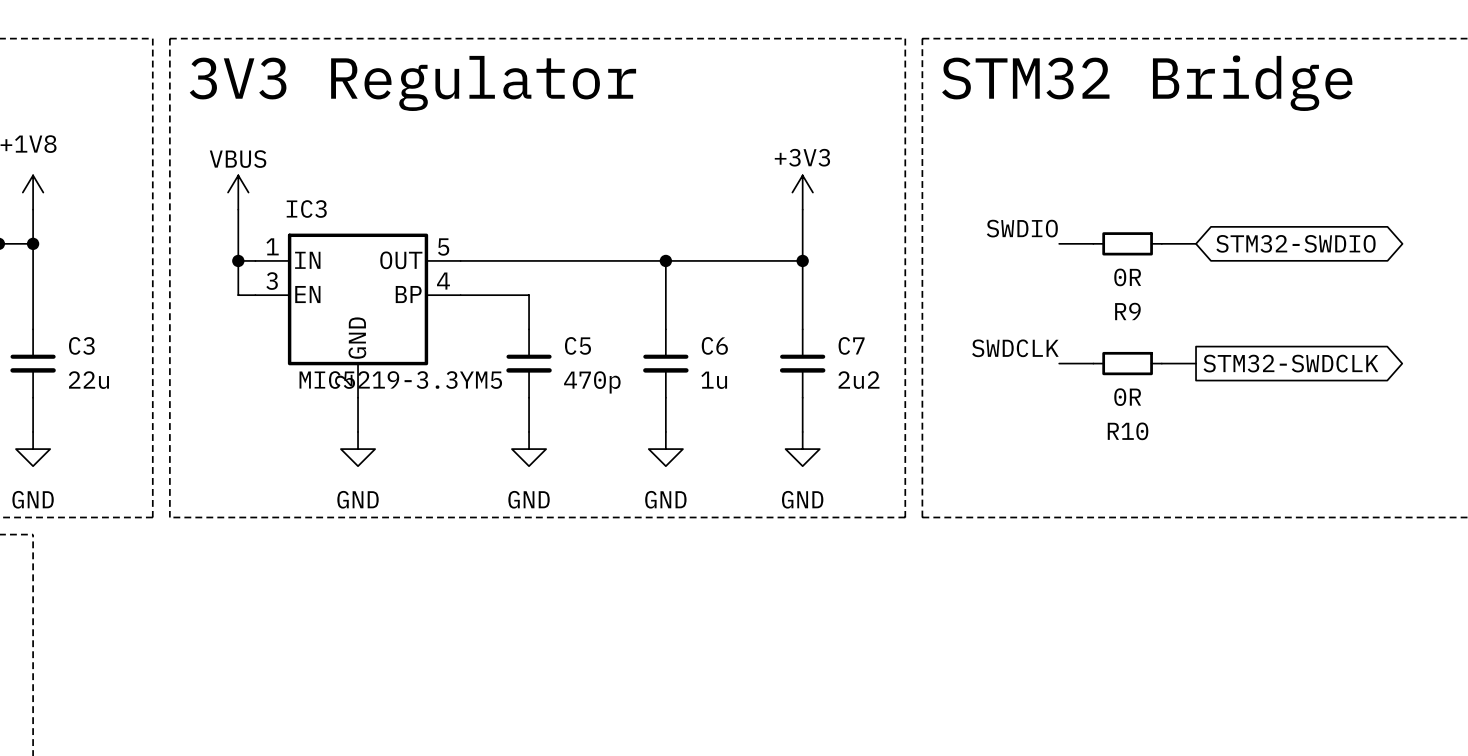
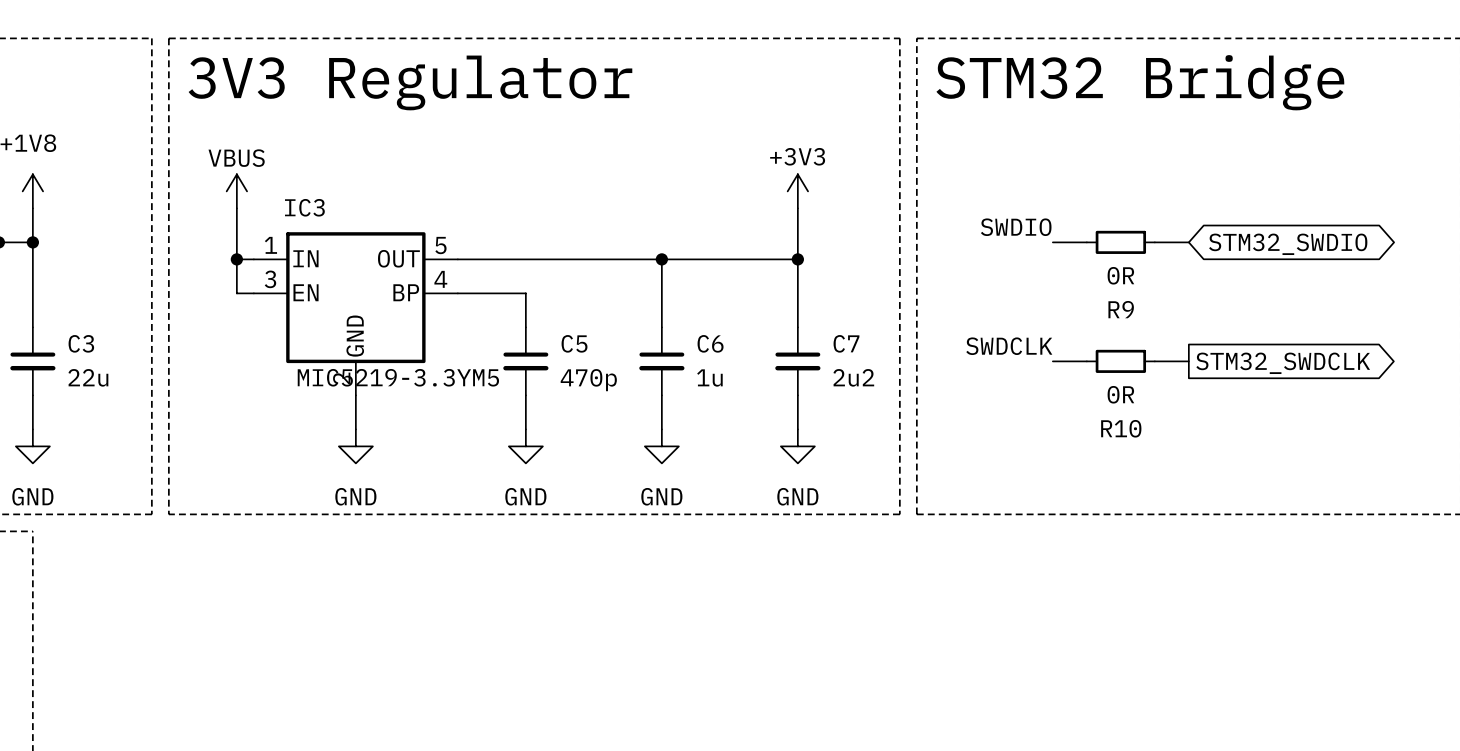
global label: STM32-SWDIO (1295, 243) -> STM32_SWDIO (1288, 244)
global label: STM32-SWDCLK (1290, 363) -> STM32_SWDCLK (1283, 363)

